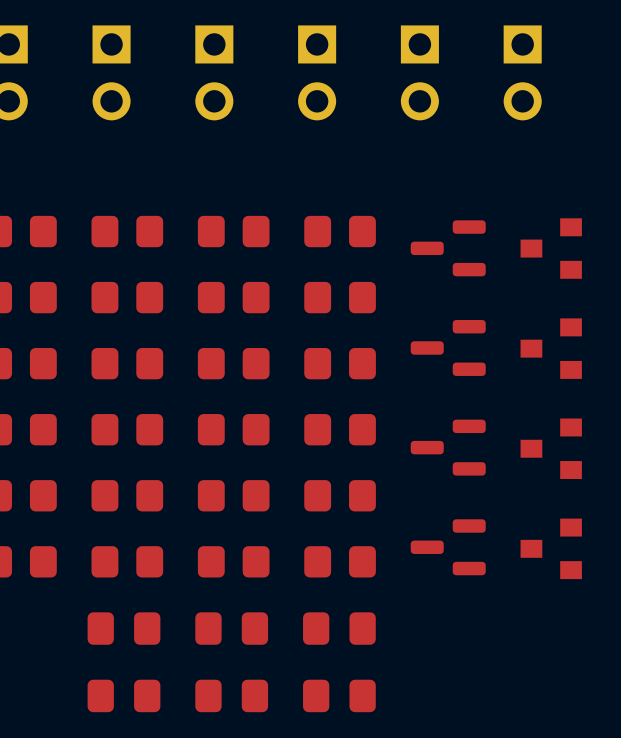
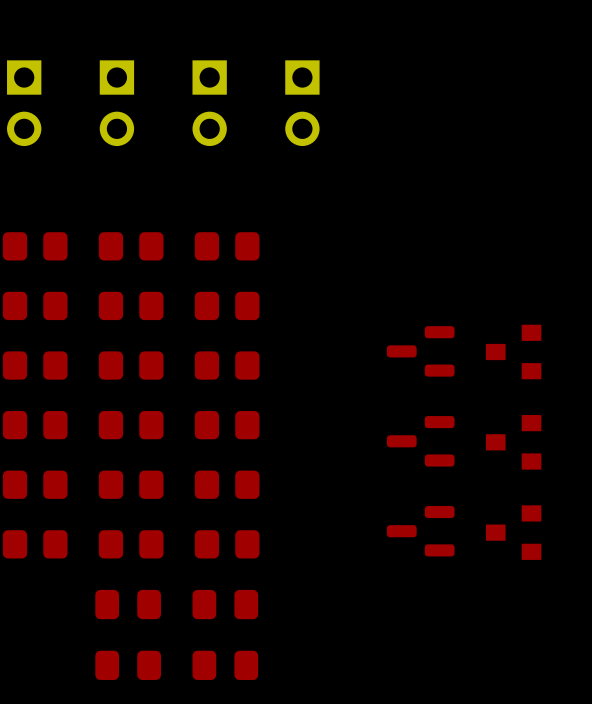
part: (419, 72) -> none
part: (522, 72) -> none
part: (340, 231) -> none
part: (448, 248) -> none
part: (551, 248) -> none
part: (340, 297) -> none
part: (340, 363) -> none
part: (340, 429) -> none
part: (340, 495) -> none
part: (340, 561) -> none
part: (339, 628) -> none
part: (339, 695) -> none

